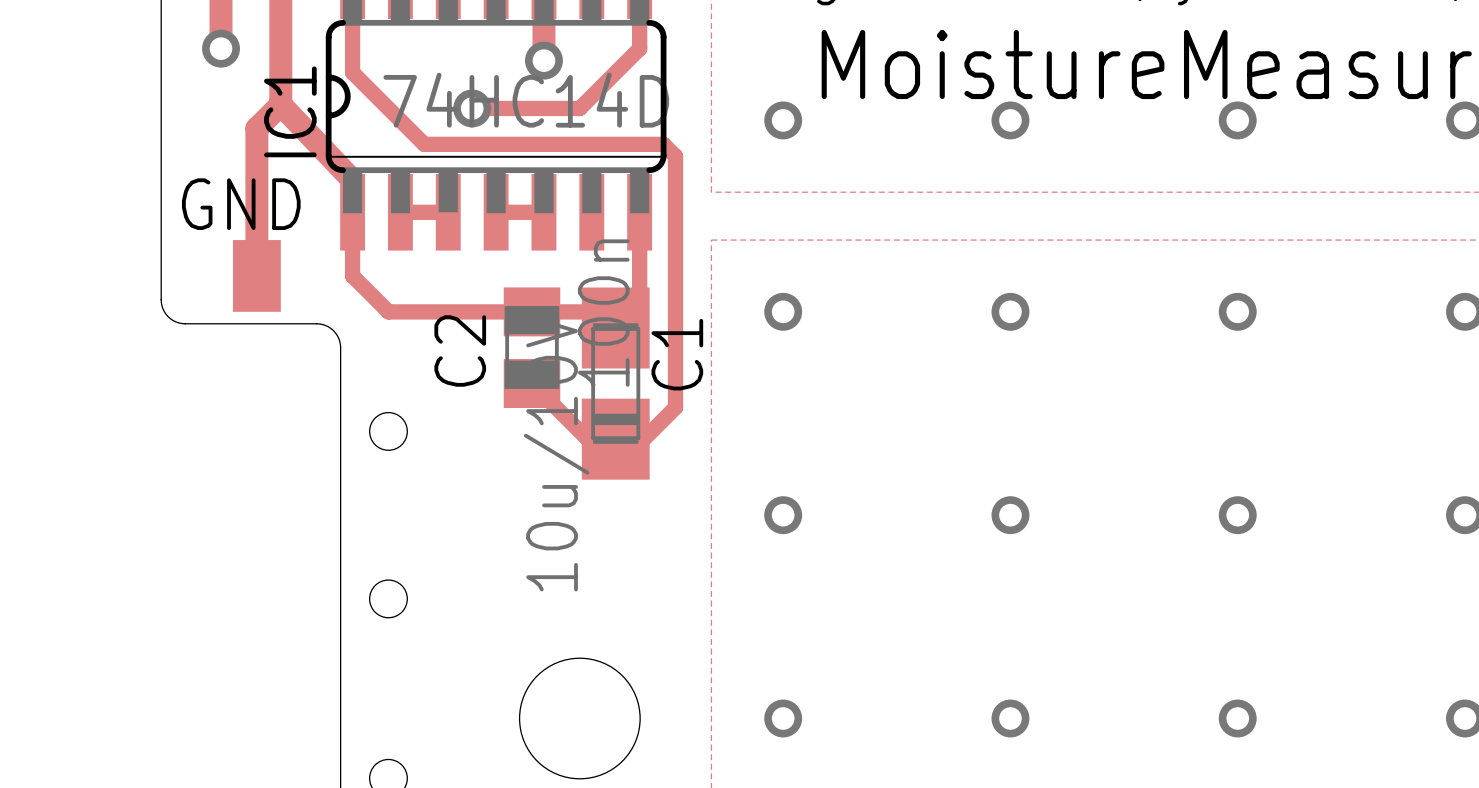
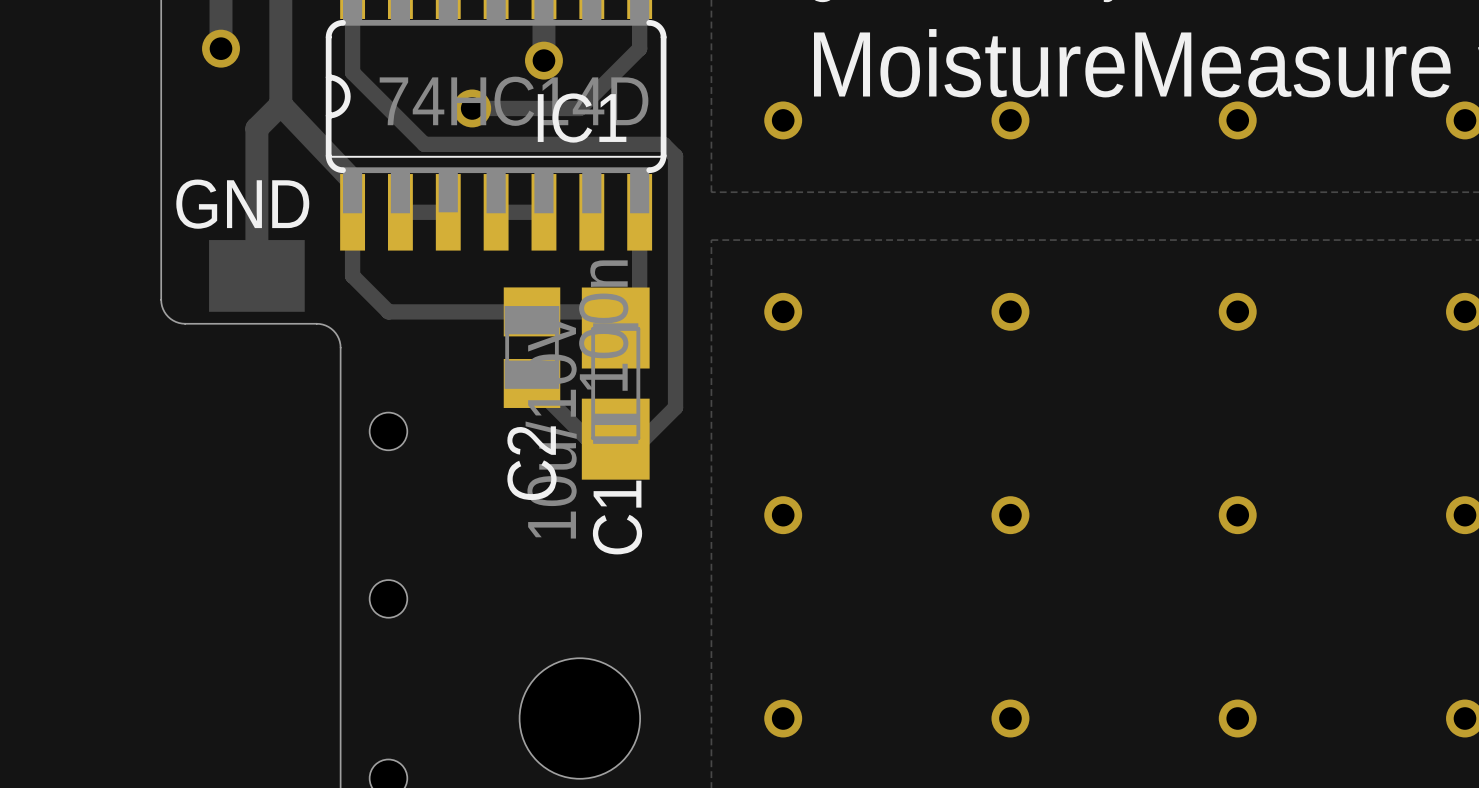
IC1 name rotation: 0° (290, 111) -> 90° clockwise (582, 118)
IC1 name position: IC1 (290, 111) -> IC1 (582, 118)
drawing shape: [232, 240, 281, 312] -> [209, 240, 305, 312]
C2 name position: C2 (460, 350) -> C2 (531, 463)
C1 name position: C1 (677, 354) -> C1 (617, 517)

